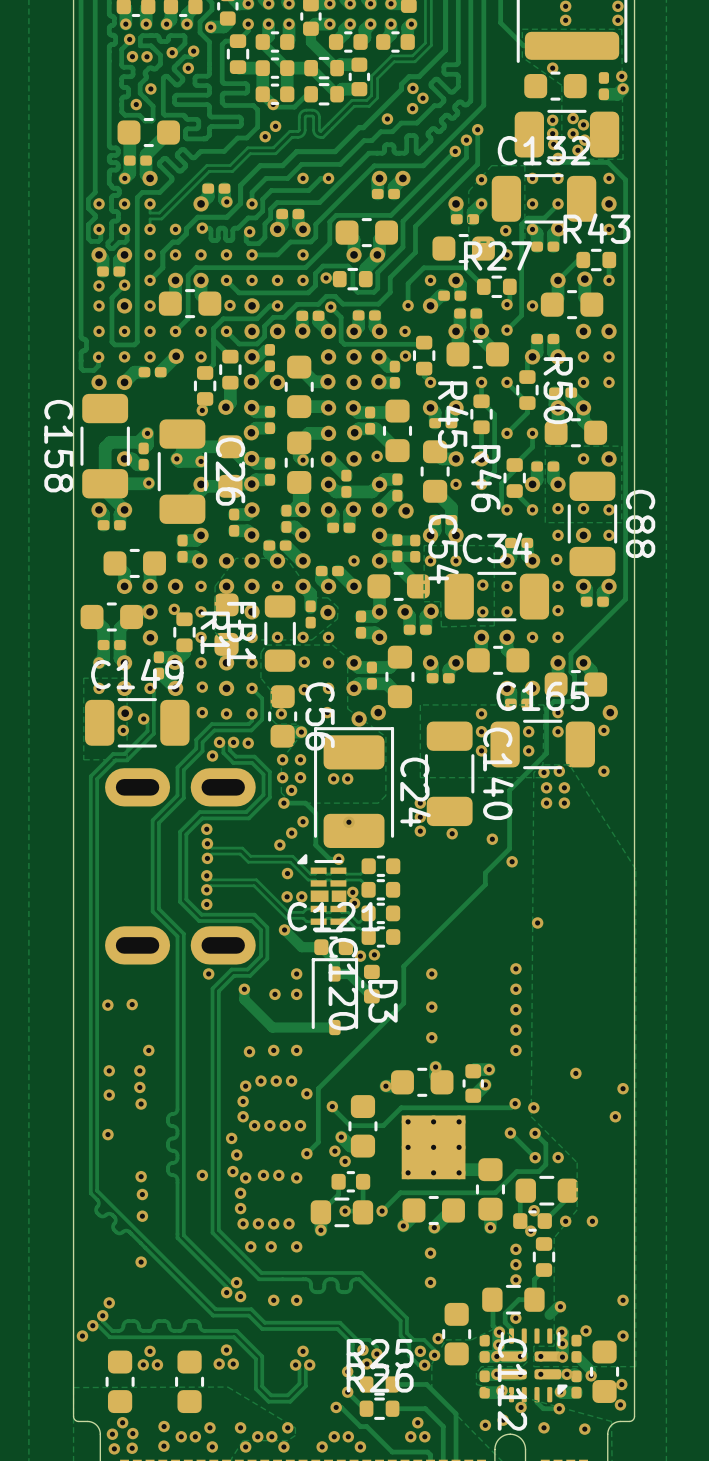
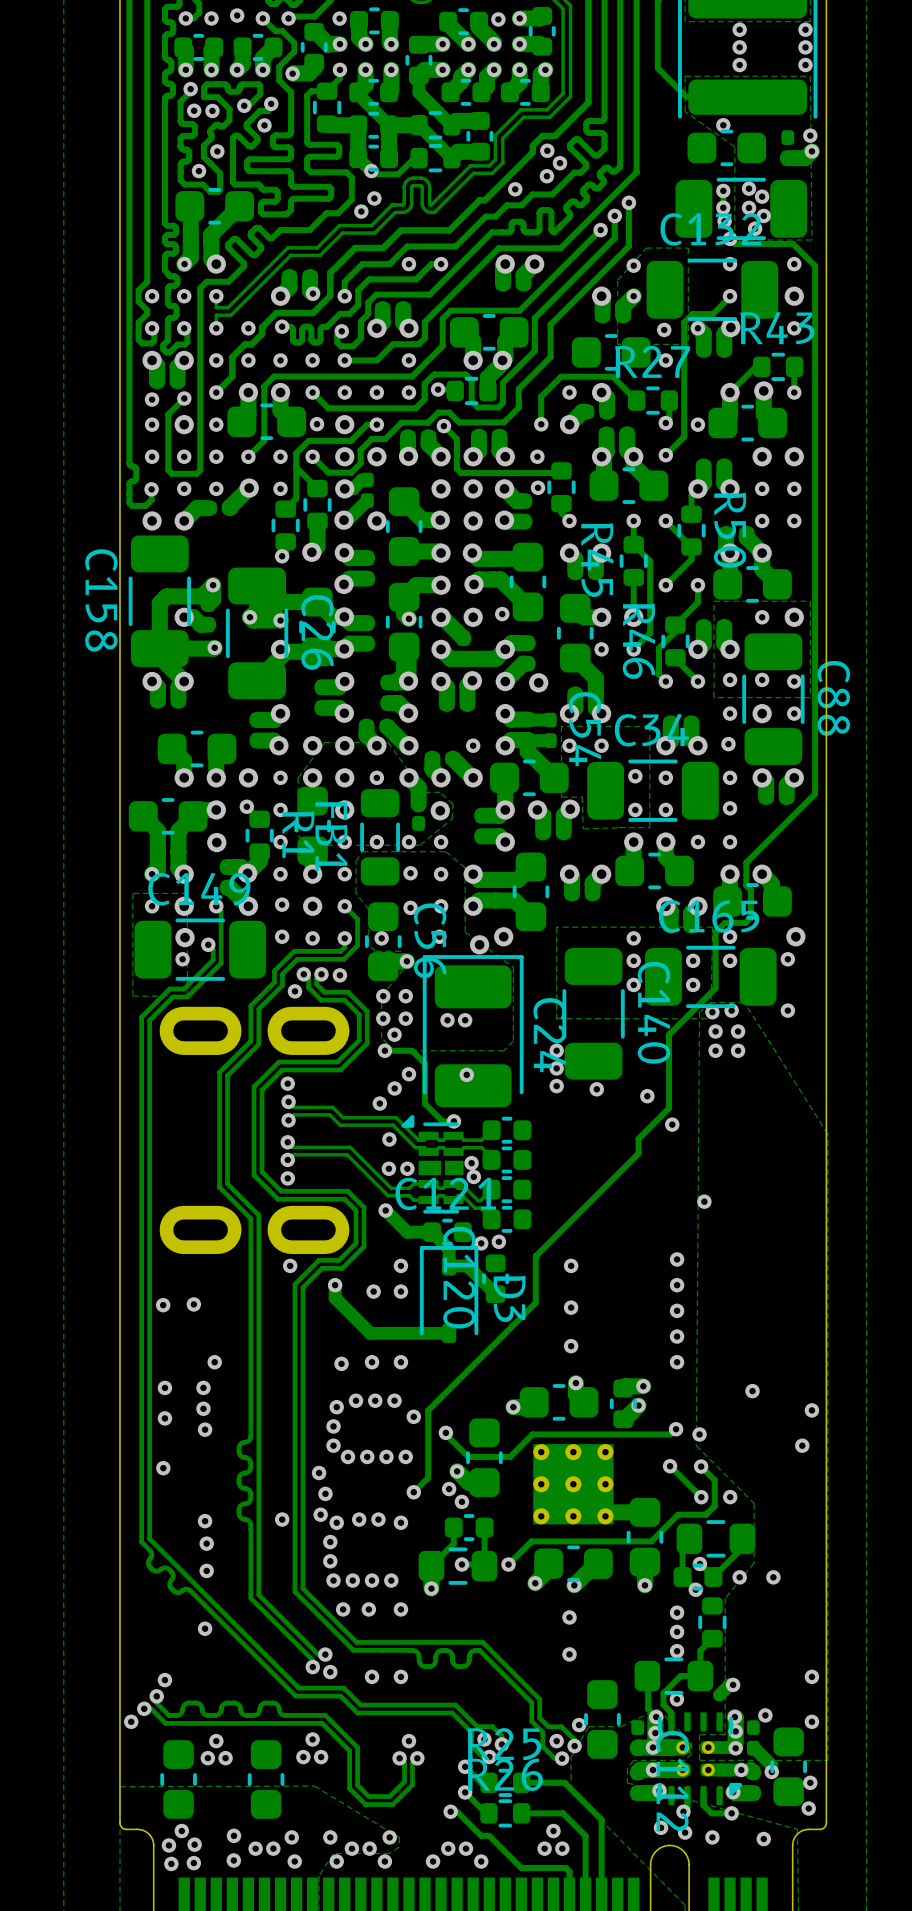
via: (532, 178) -> none
via: (532, 203) -> none
via position: (485, 1425) -> (685, 1832)

